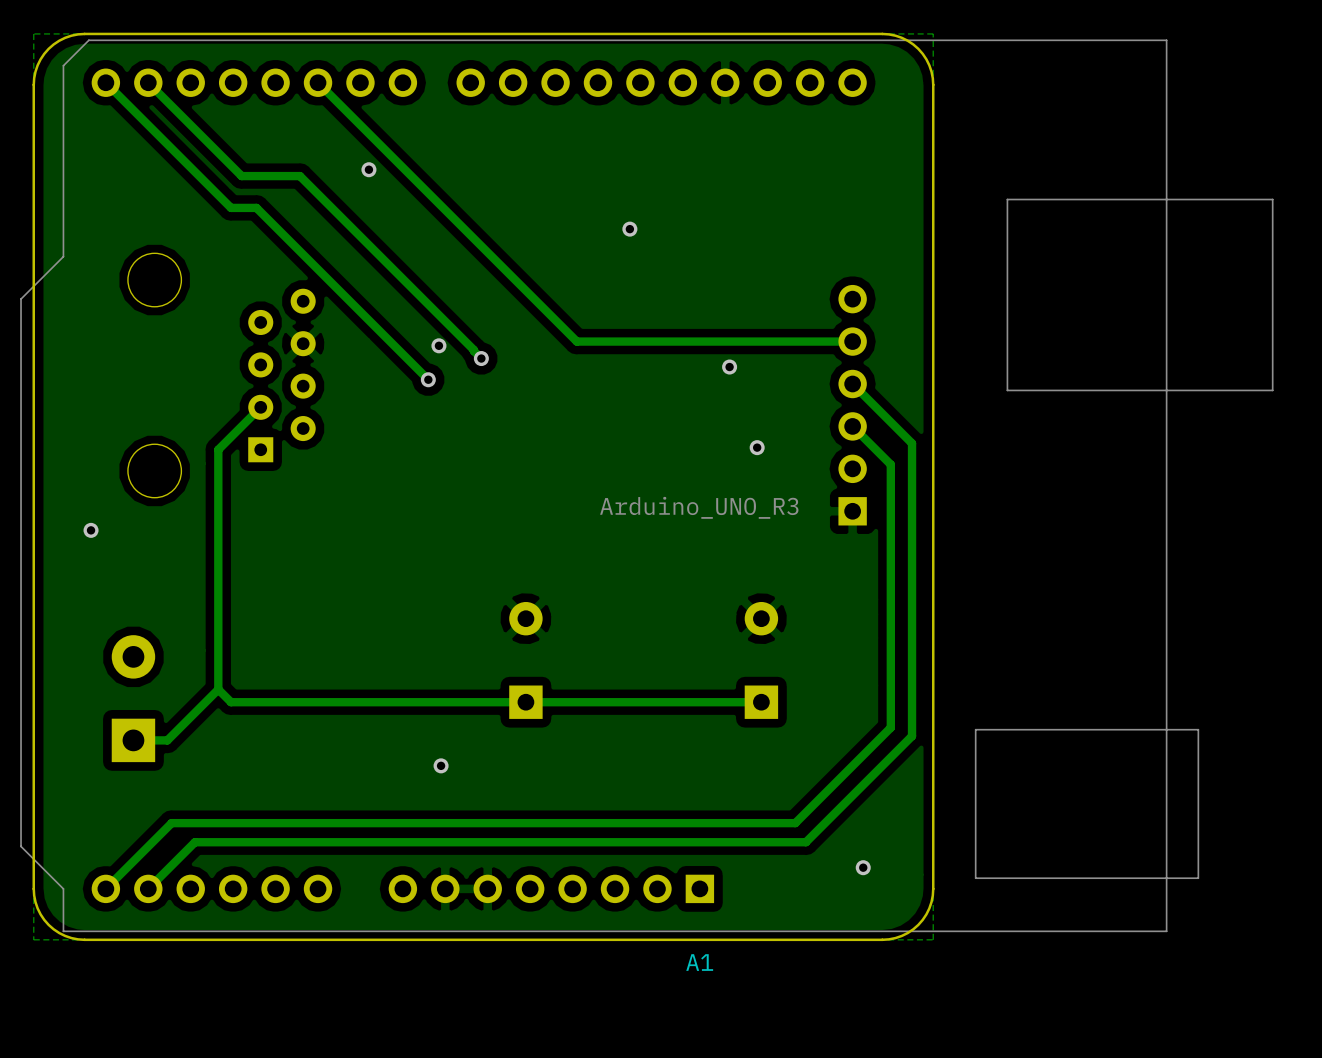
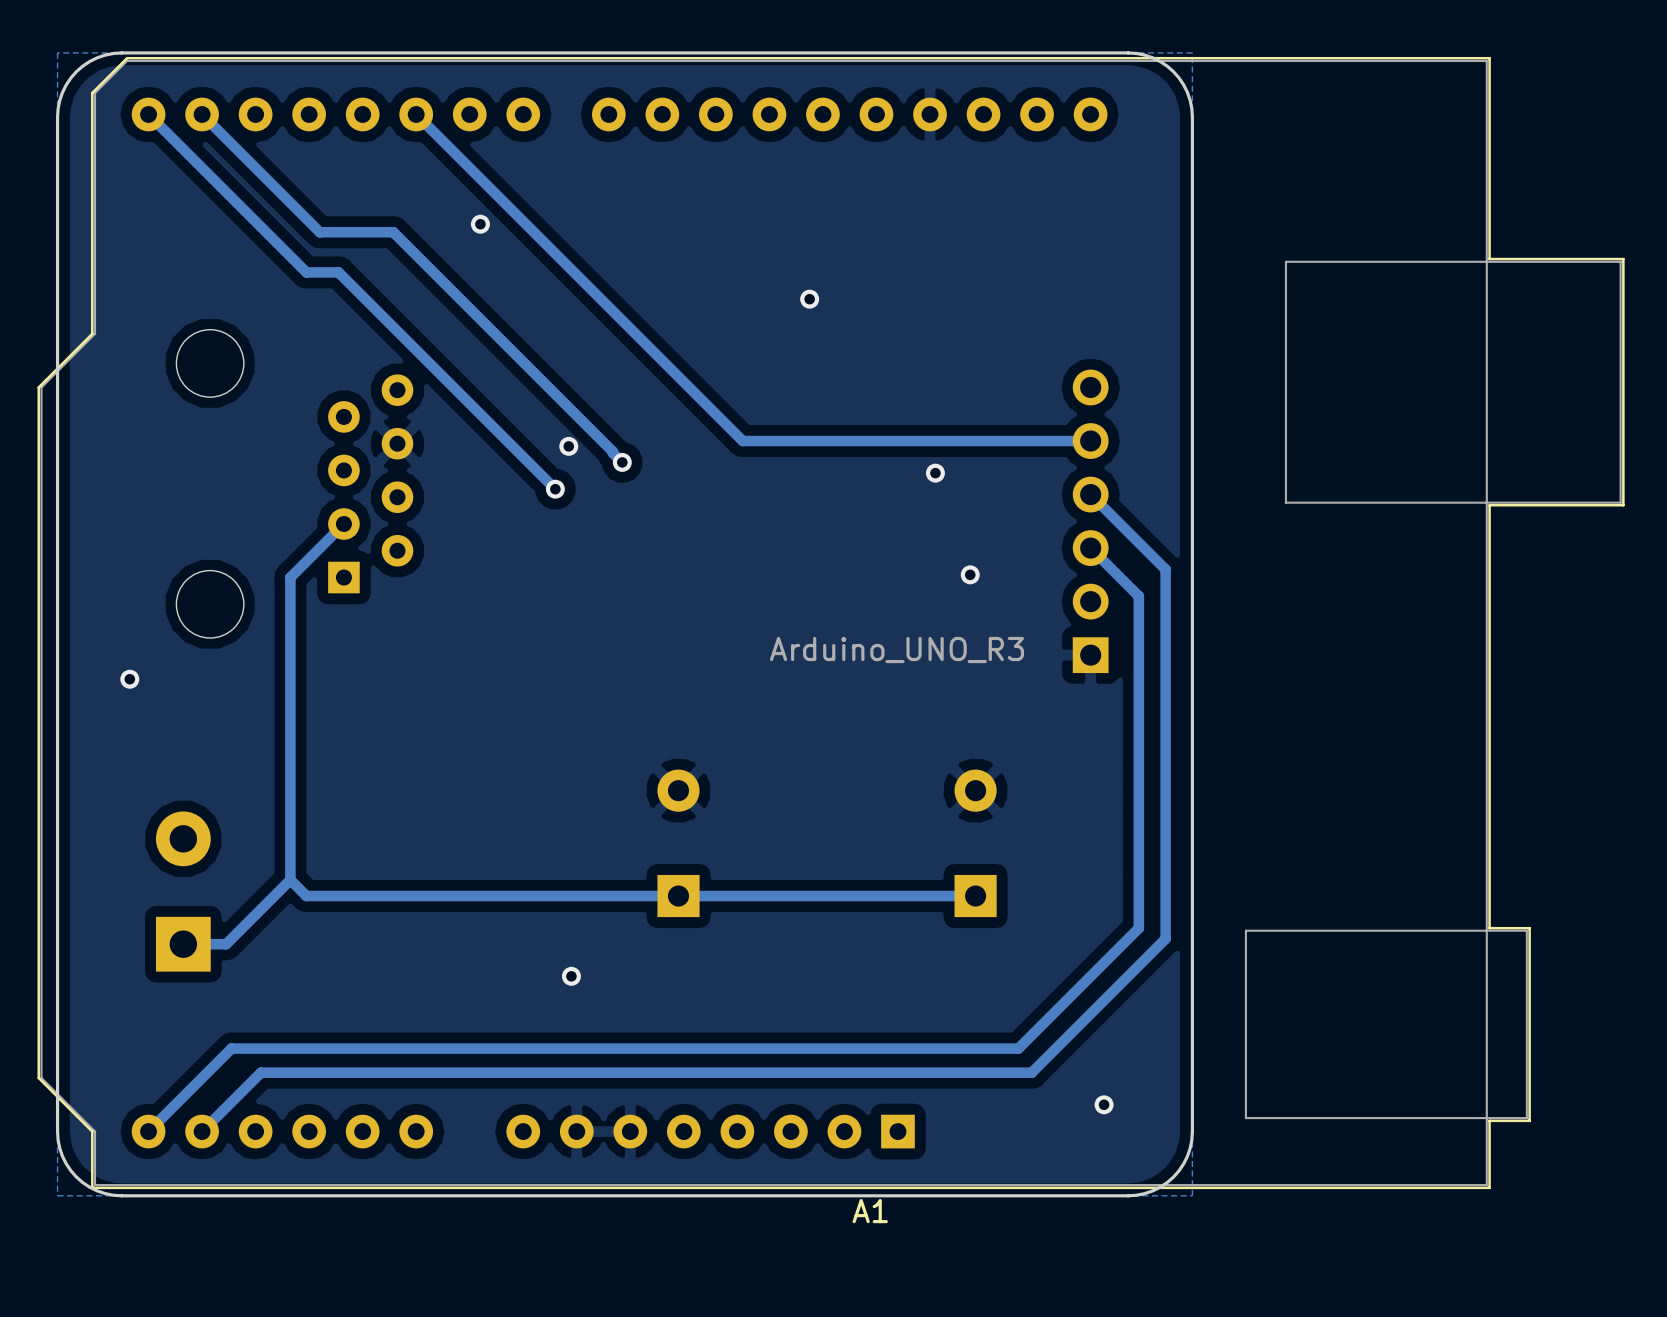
A1 footprint: [20, 39, 1274, 933] -> [37, 56, 1625, 1190]

